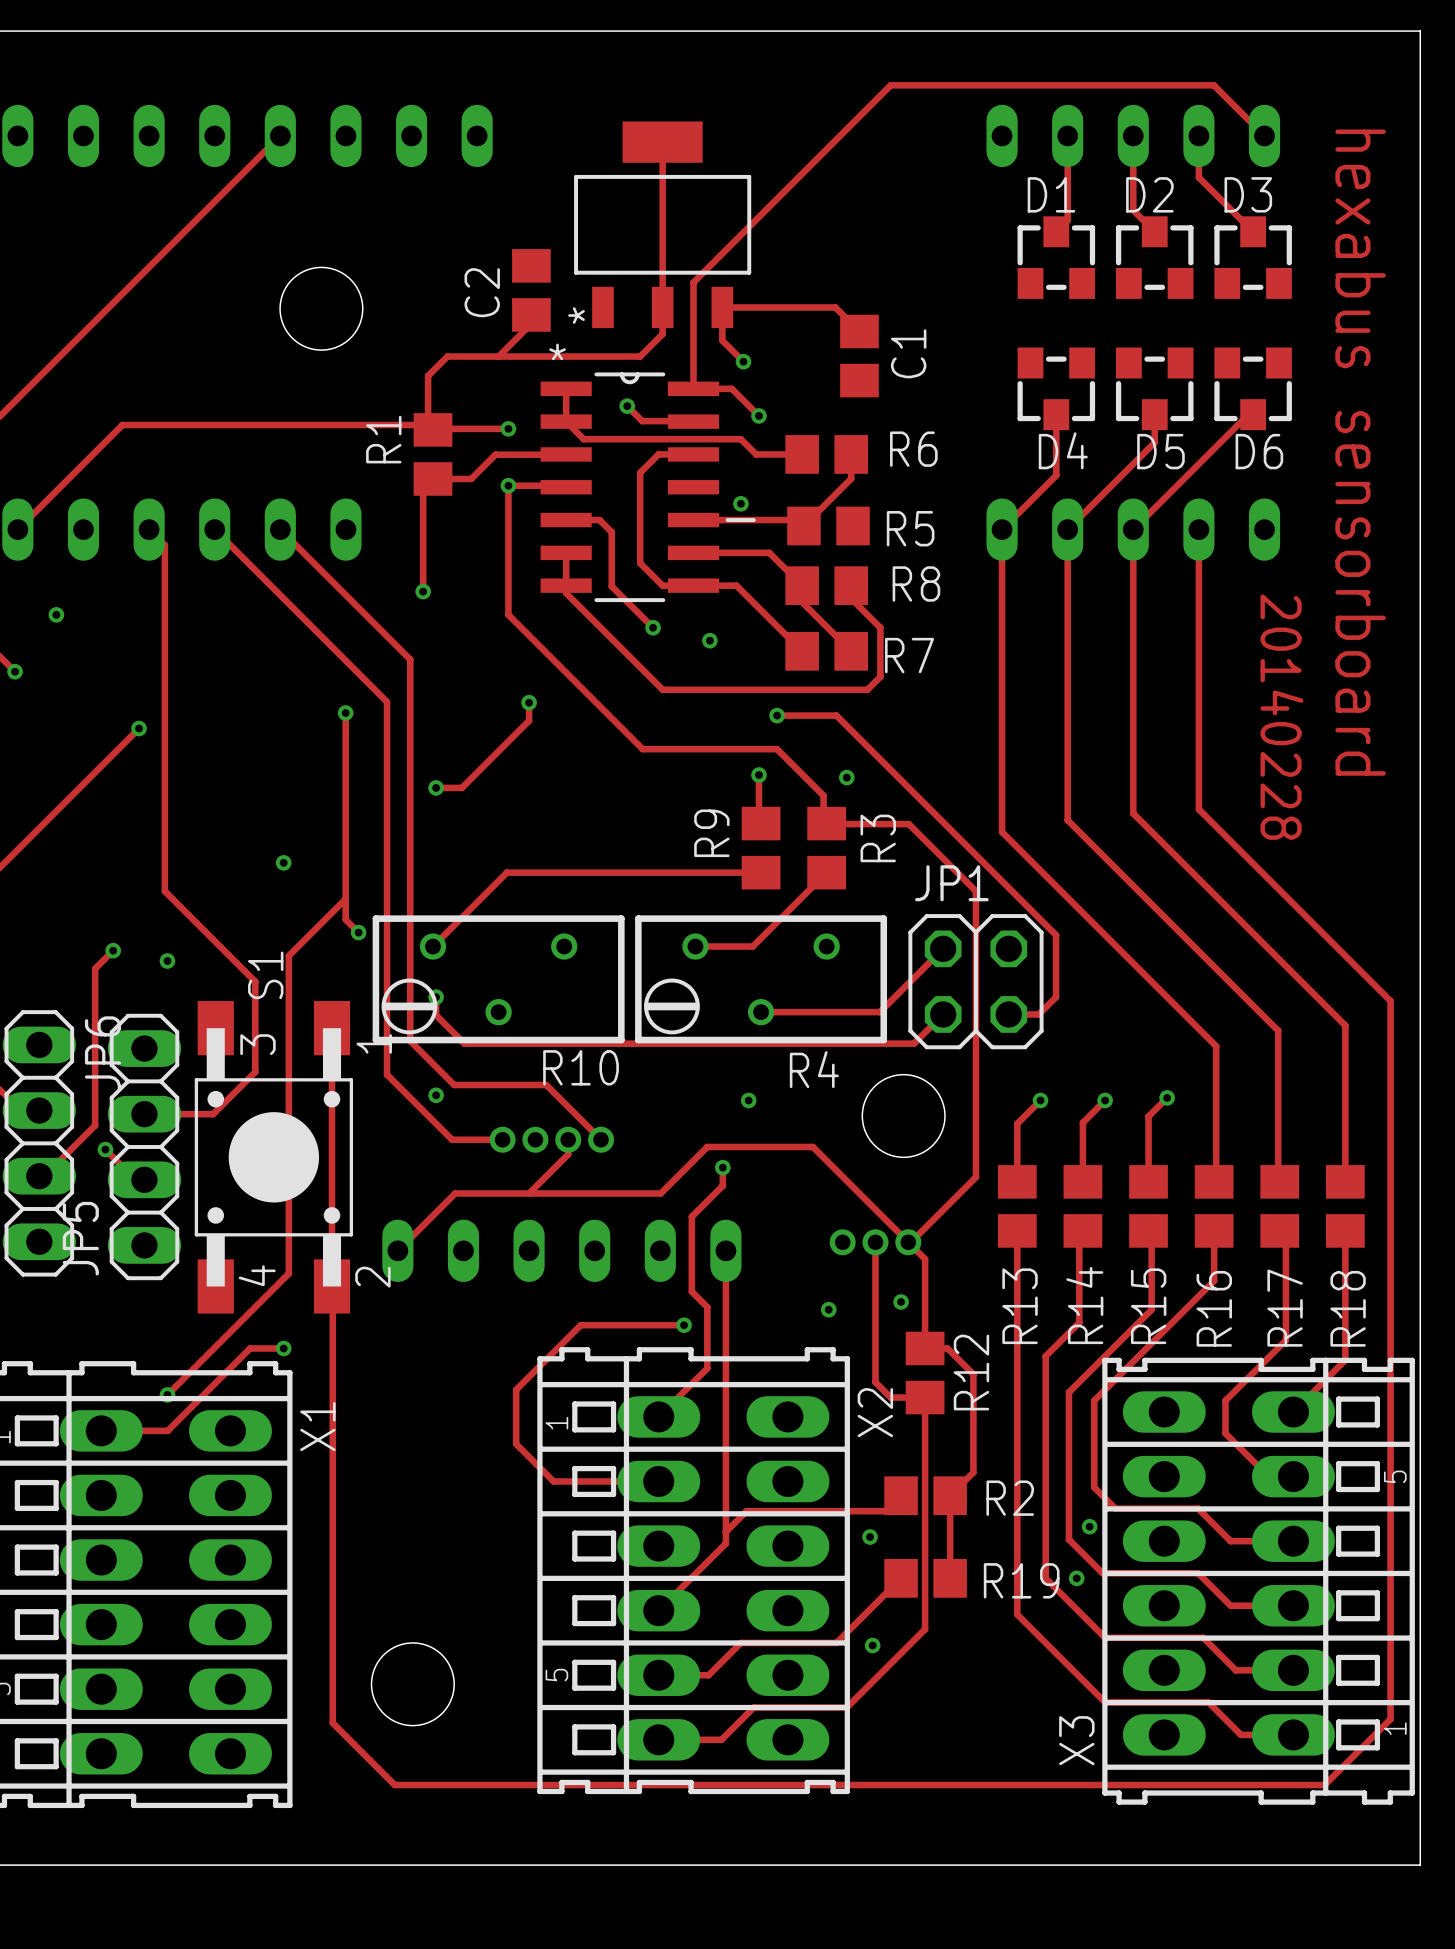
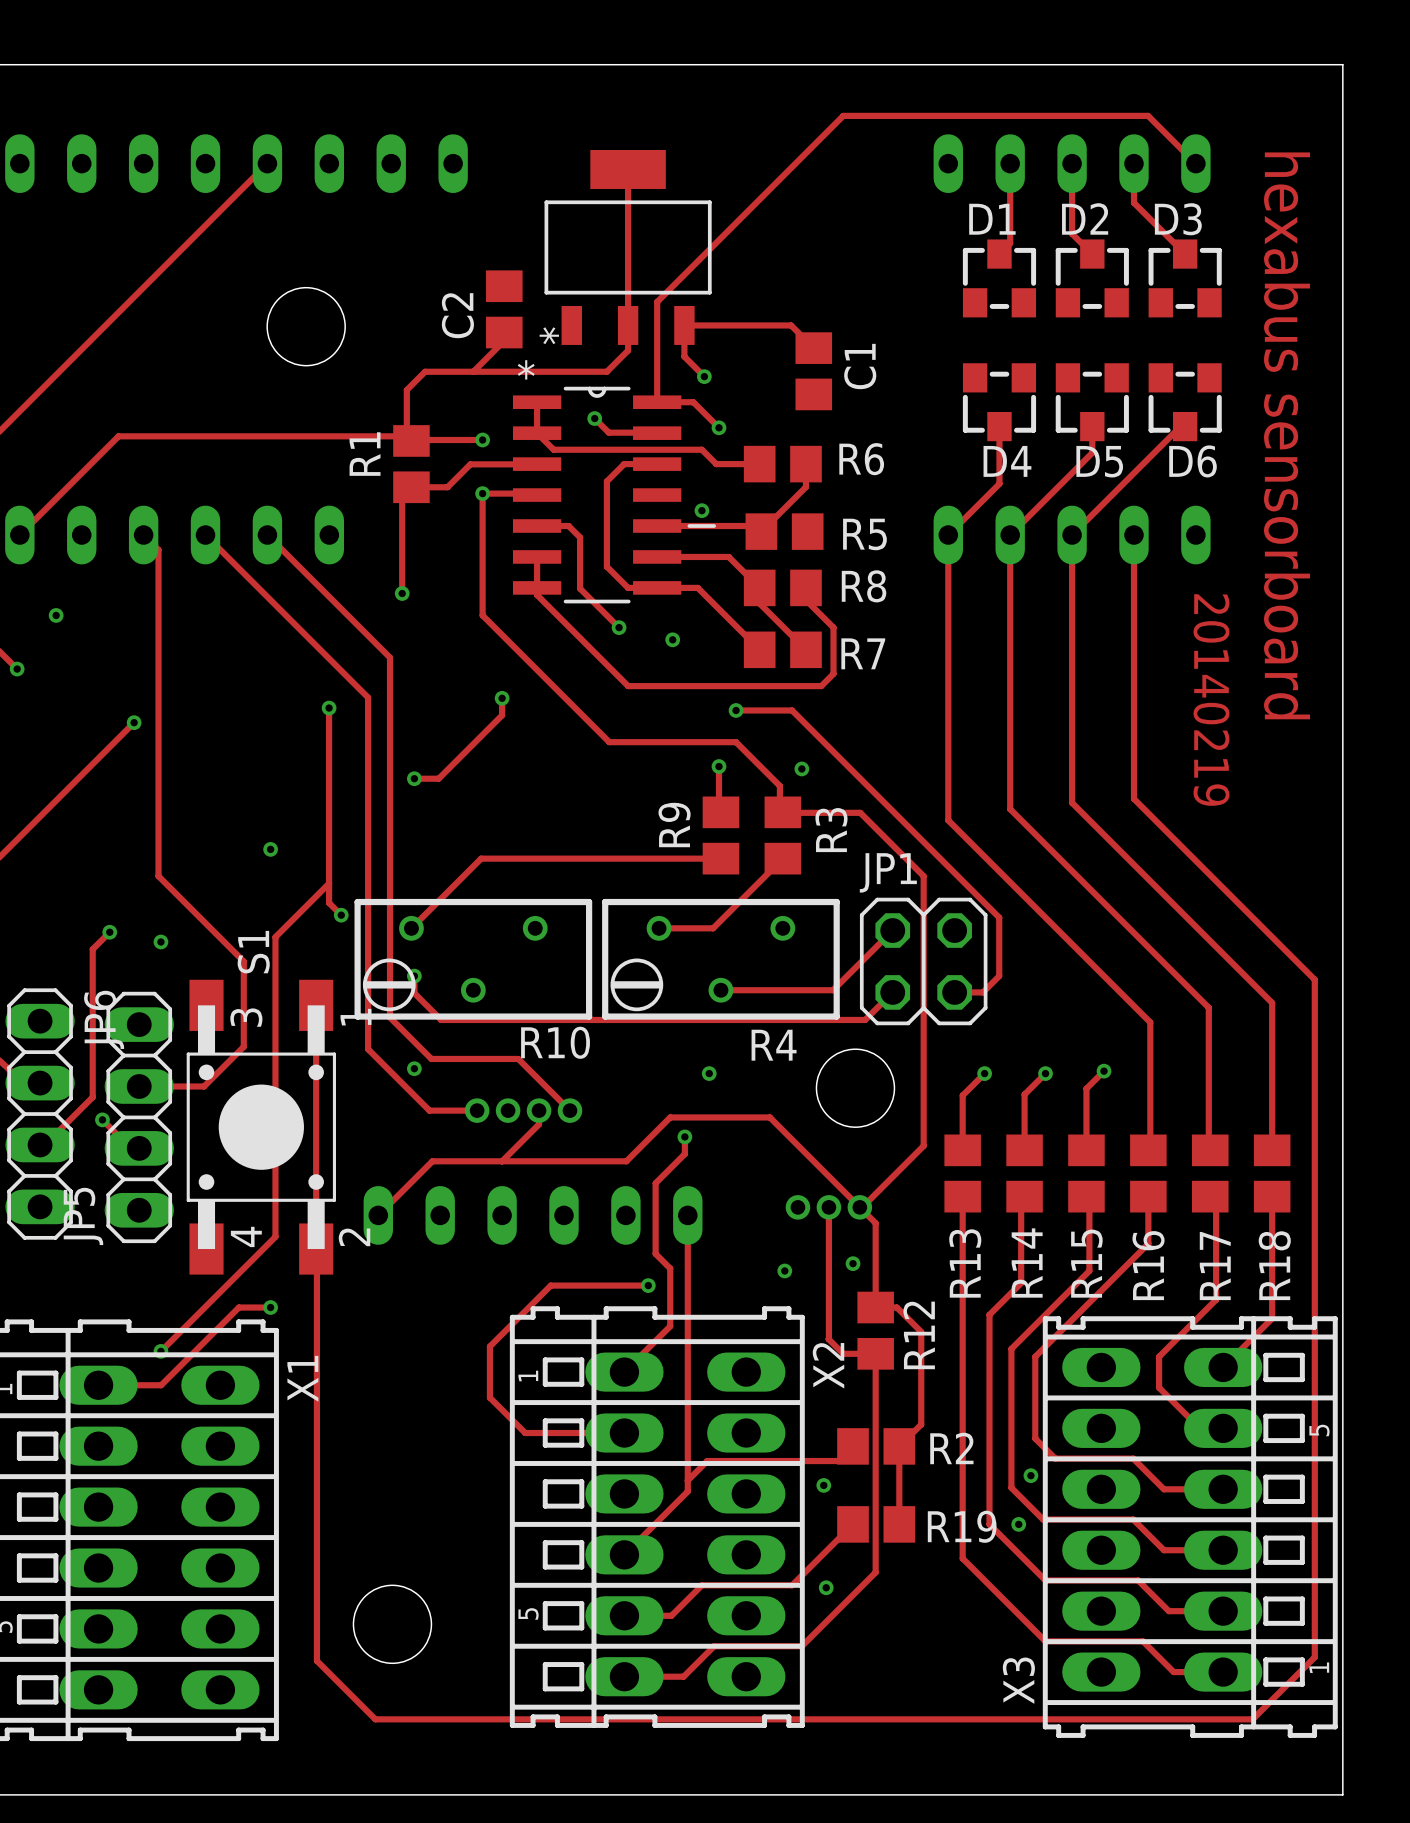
text: 20140228 (1281, 717) -> 20140219 (1211, 700)

